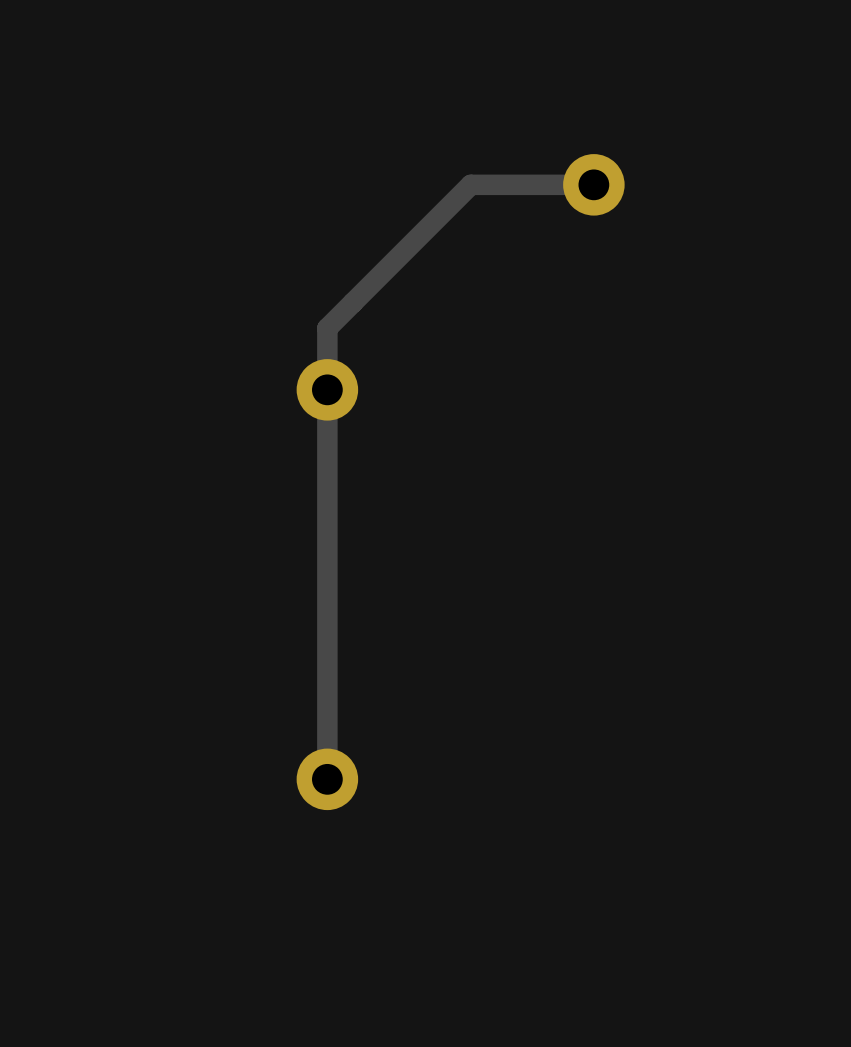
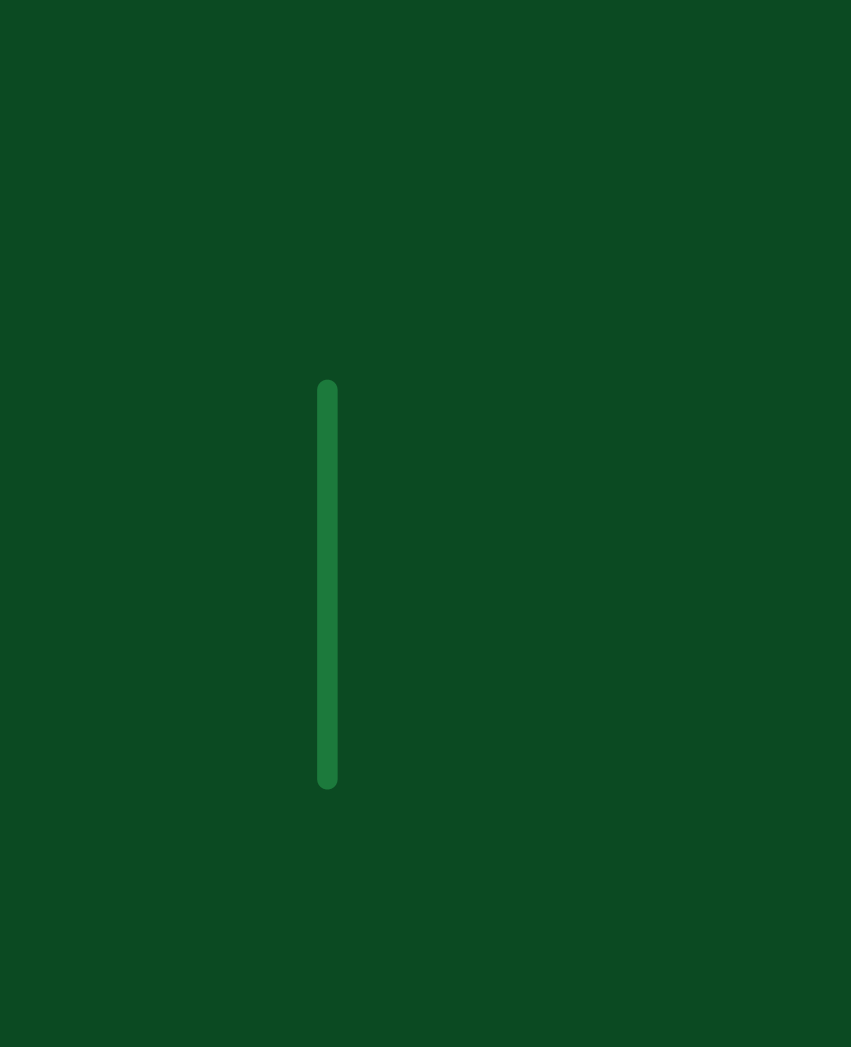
track: (593, 184) (470, 184) (327, 328) (327, 389) -> none
via: (593, 184) -> none
via: (327, 389) -> none
via: (327, 779) -> none

